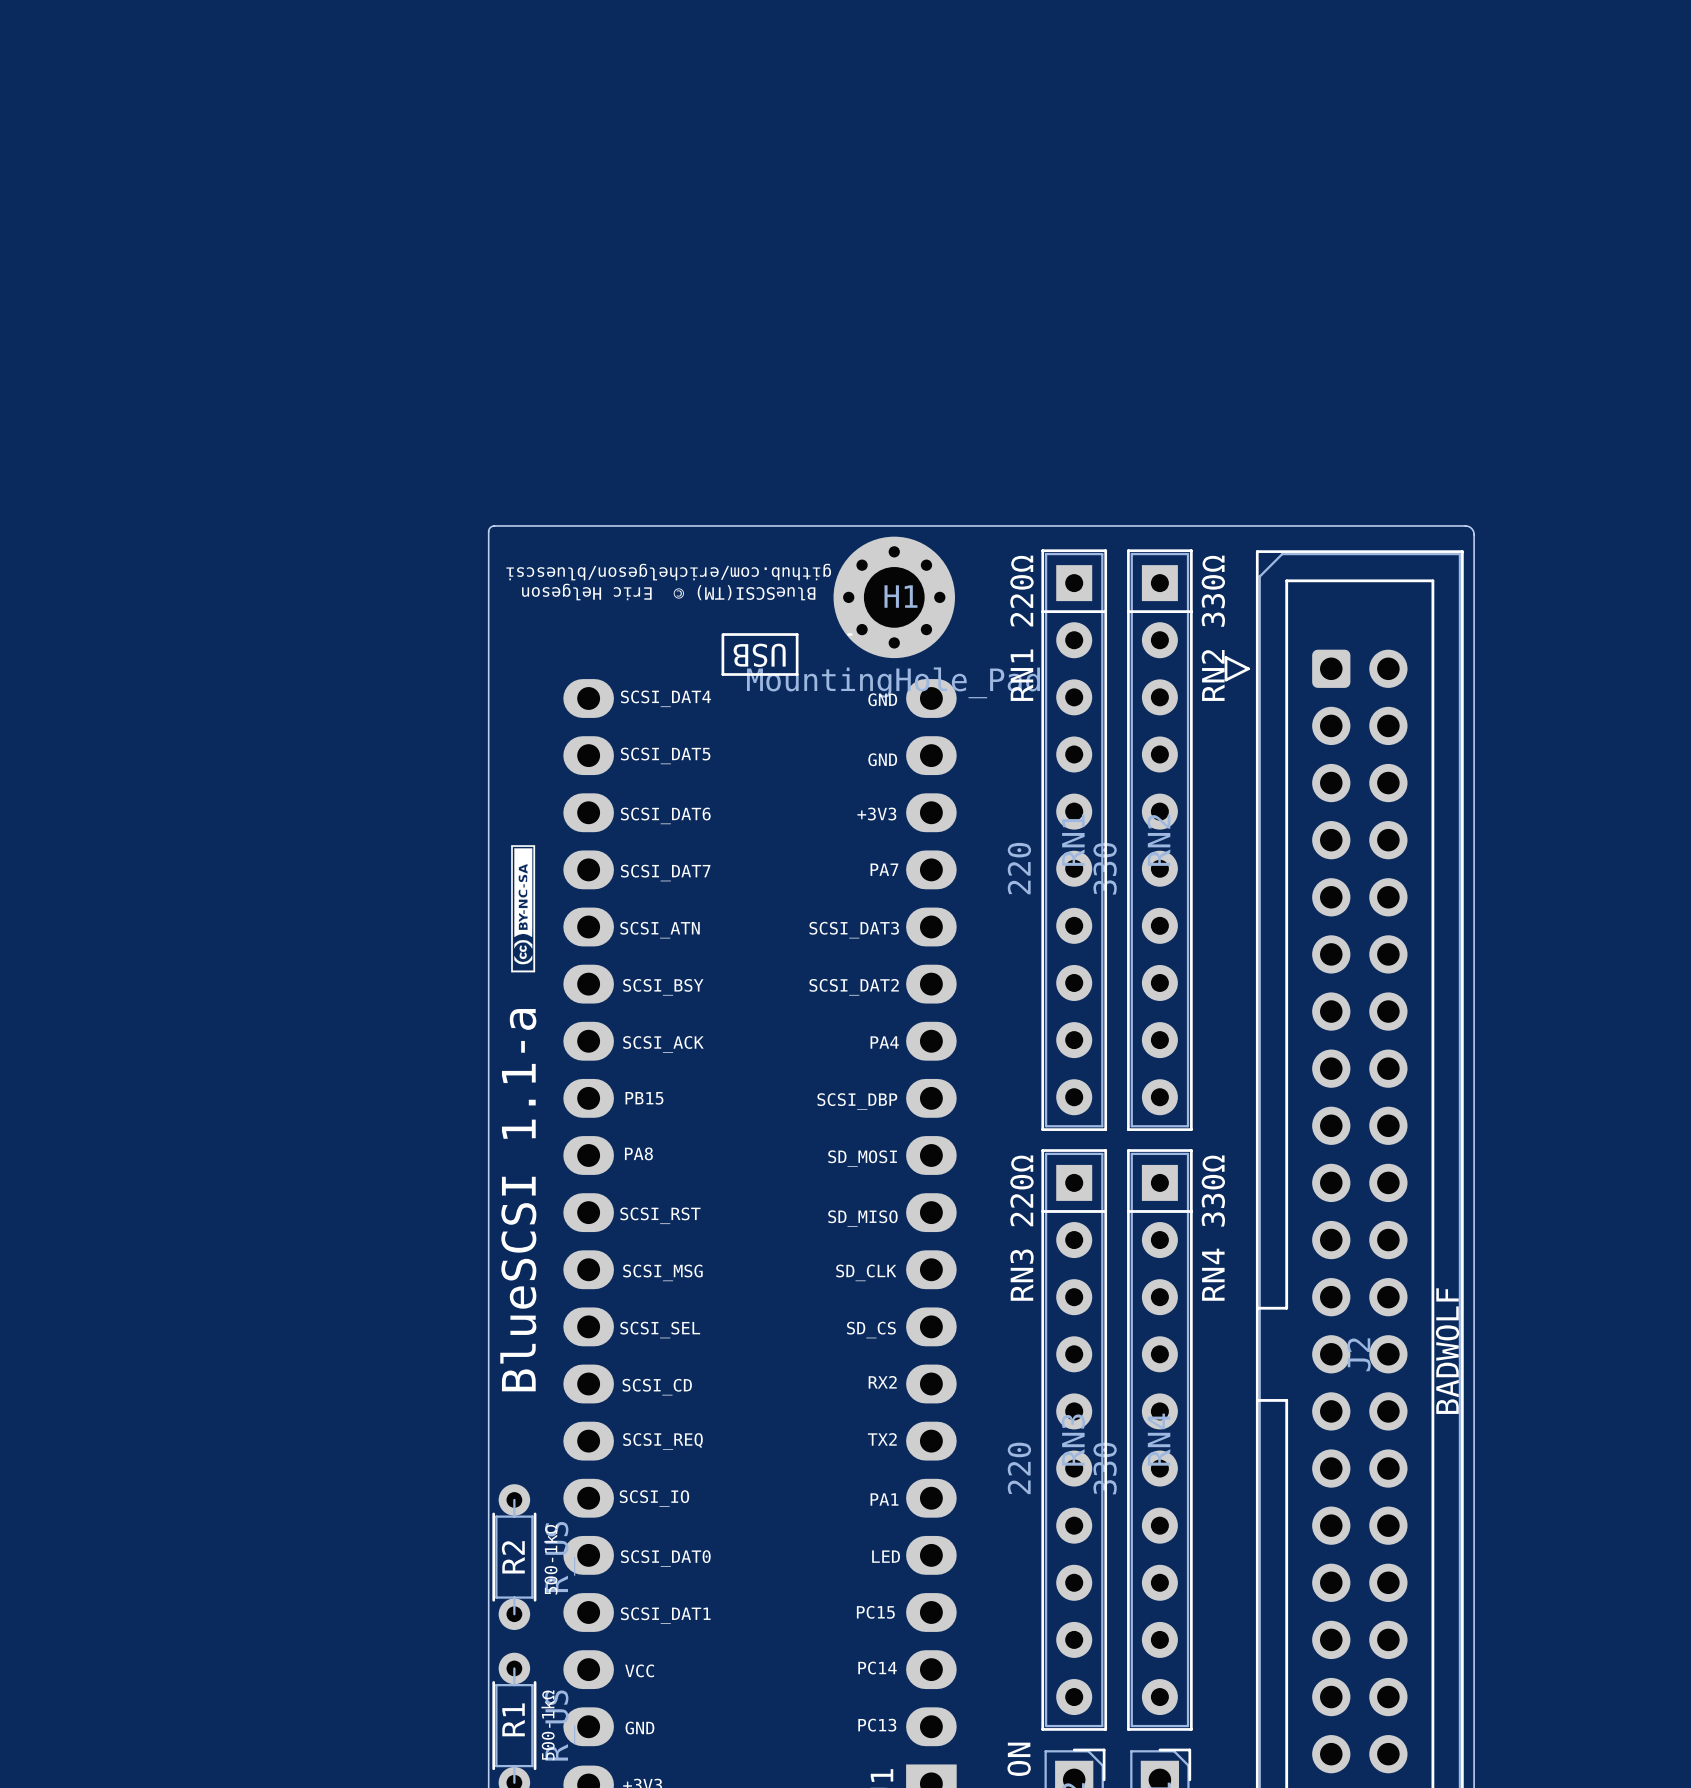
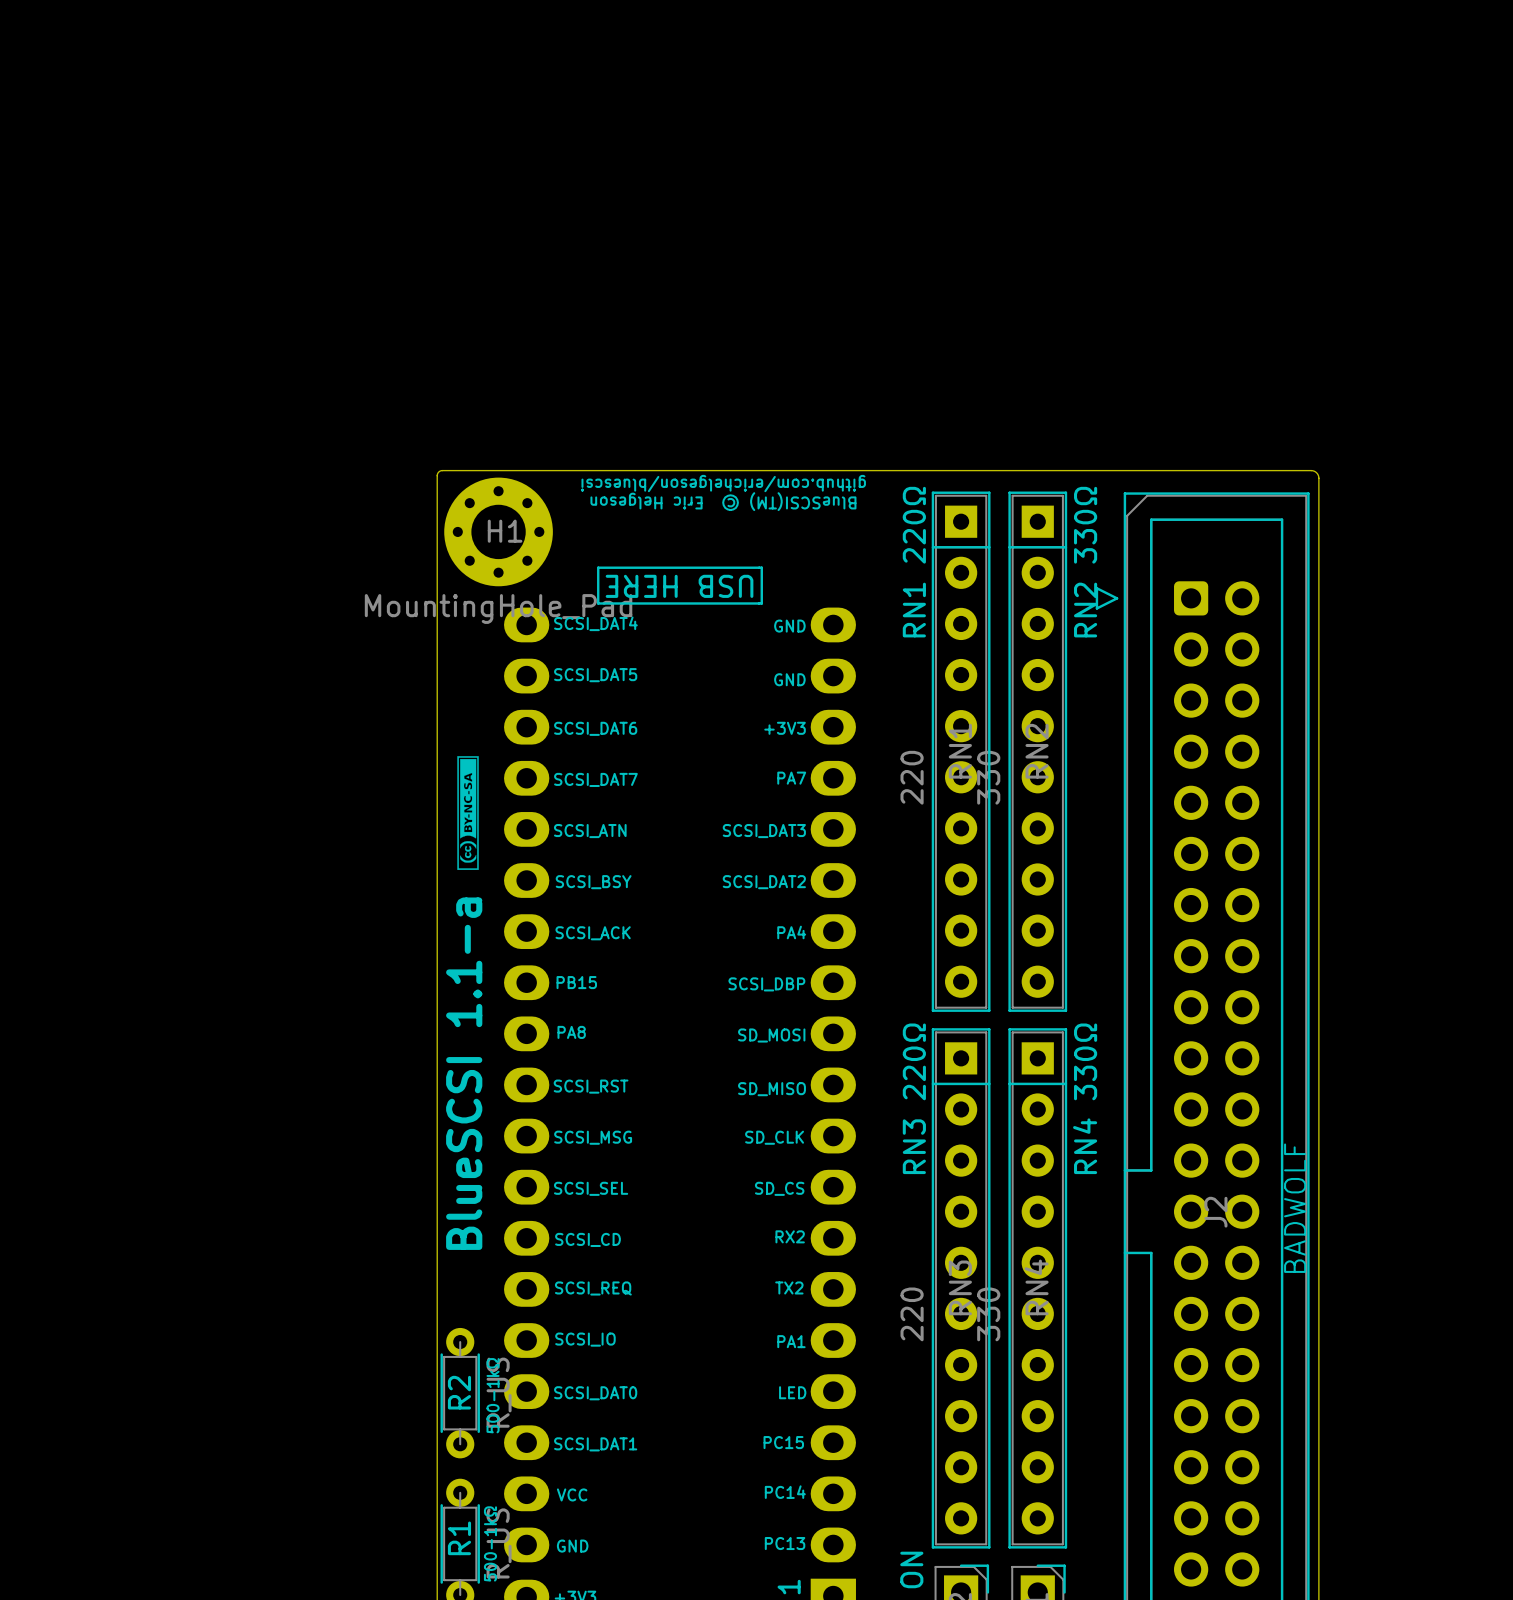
text position: github.com/erichelgeson/bluescsi (668, 572) -> github.com/erichelgeson/bluescsi (723, 483)
text position: BlueSCSI(TM) © Eric Helgeson (668, 592) -> BlueSCSI(TM) © Eric Helgeson (723, 501)
H1 position: (894, 597) -> (498, 531)
line: (722, 634) (722, 674) -> (648, 567) (598, 567) (598, 603) (646, 603)
line: (797, 634) (797, 674) -> (761, 567) (761, 603) (713, 603)
line: none -> (713, 567) (759, 567)
text: USB (759, 655) -> USB HERE (679, 586)

